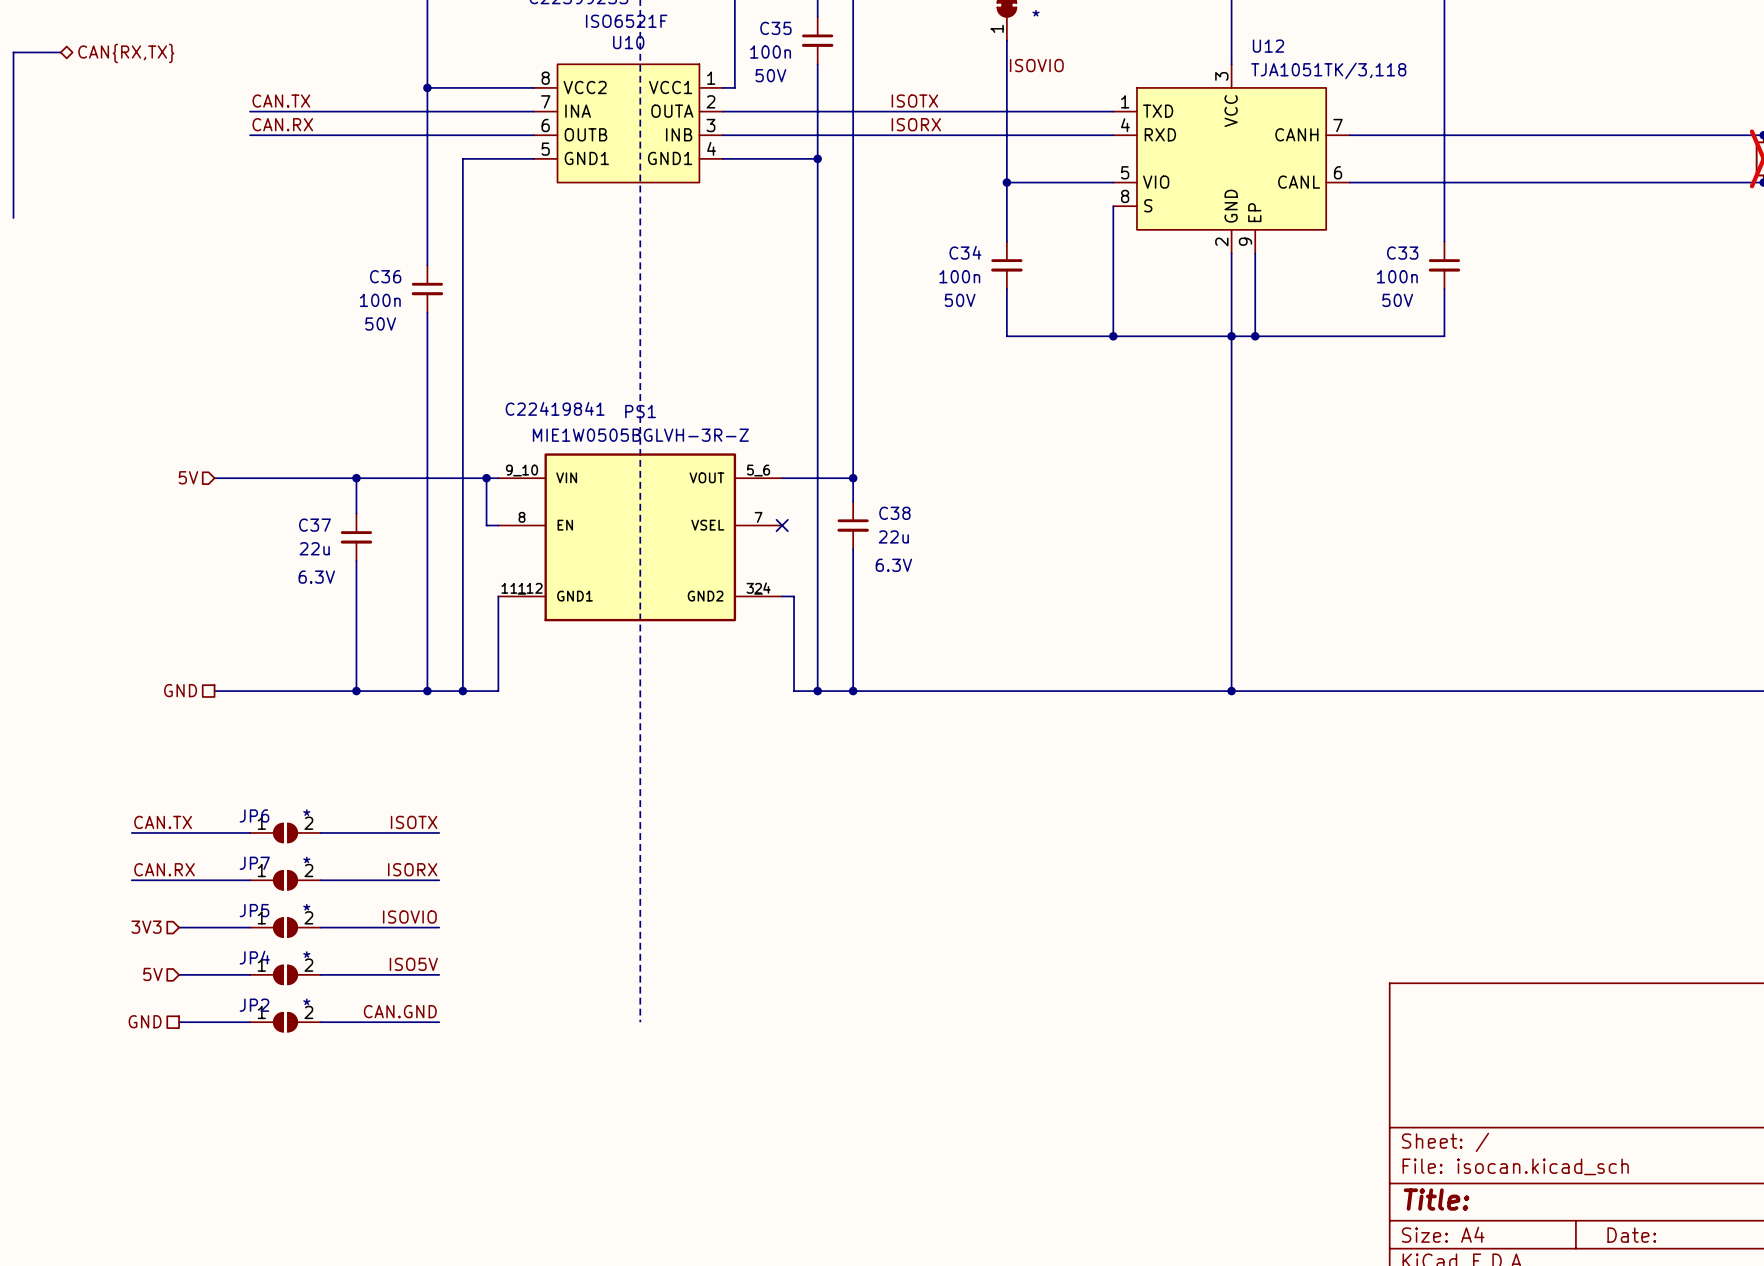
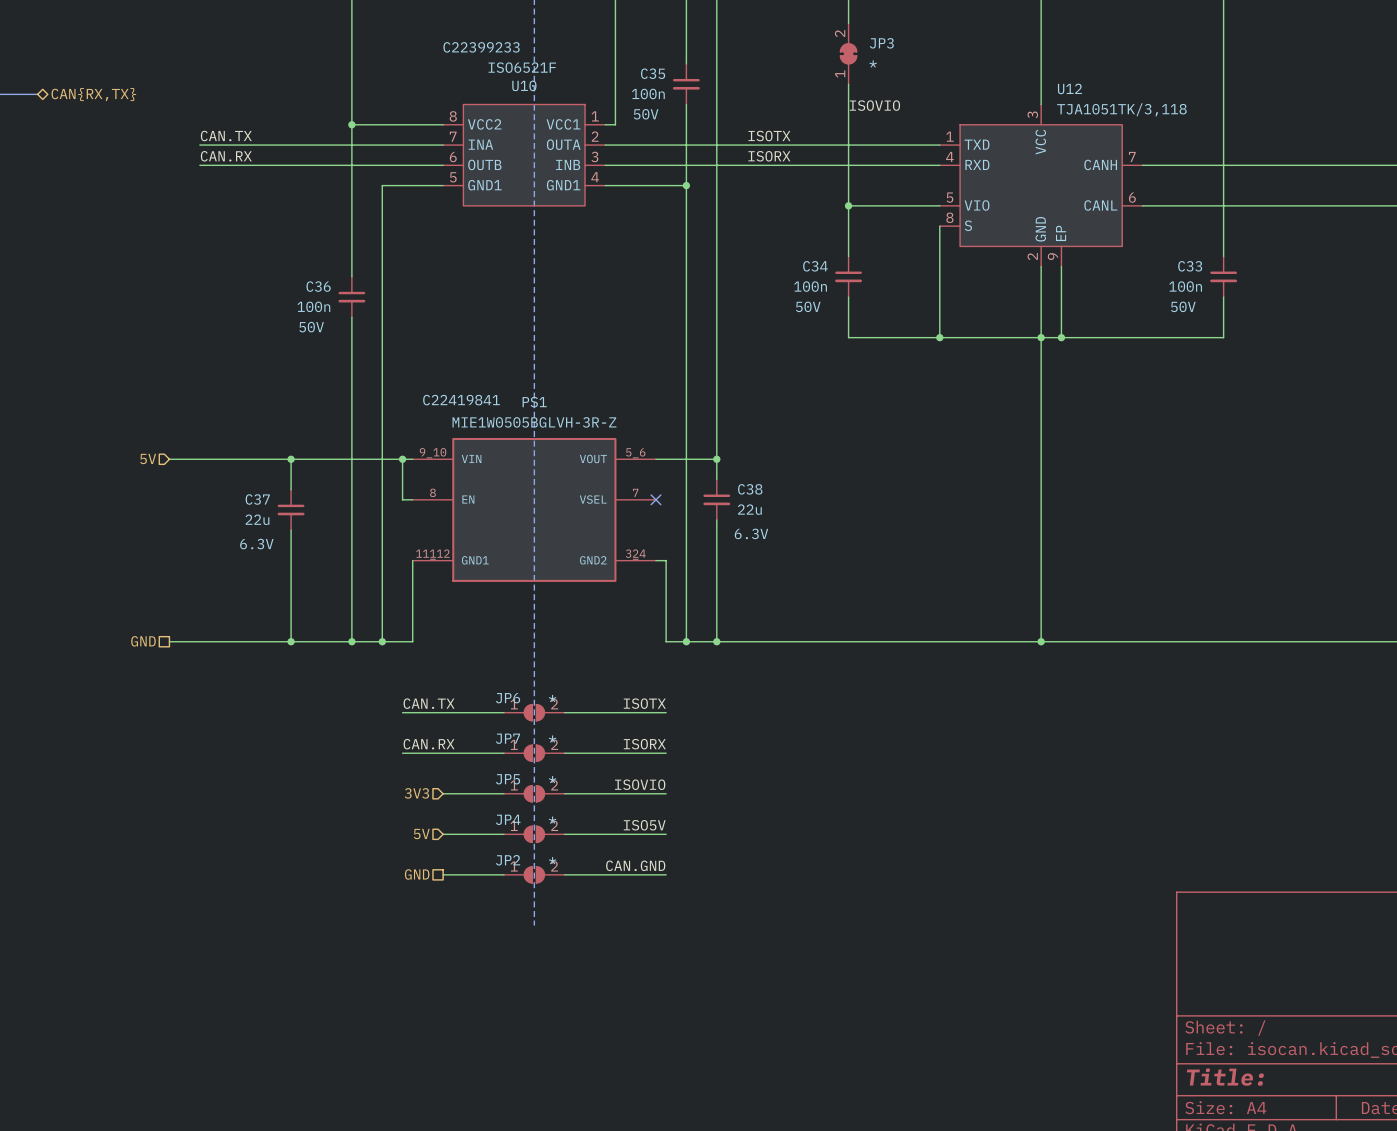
label: none -> CAN.TX (429, 703)
label: none -> ISOTX (644, 703)
wire: none -> (564, 712) (666, 712)
label: none -> CAN.RX (429, 744)
label: none -> ISORX (644, 744)
wire: none -> (564, 753) (666, 753)
label: CAN.TX (163, 822) -> none
label: ISOTX (414, 822) -> none
wire: (131, 832) (250, 832) -> none
JP6 position: (285, 832) -> (534, 712)
wire: (320, 832) (439, 832) -> (402, 712) (503, 712)
label: none -> ISOVIO (640, 784)
hierarchical label: none -> 3V3 (416, 793)
wire: none -> (443, 793) (503, 793)
wire: none -> (564, 793) (666, 793)
label: CAN.RX (164, 869) -> none
label: ISORX (412, 869) -> none
wire: (131, 880) (250, 880) -> none
JP7 position: (285, 880) -> (534, 753)
wire: (320, 880) (439, 880) -> (402, 753) (503, 753)
label: none -> ISO5V (644, 825)
hierarchical label: none -> 5V (421, 834)
wire: none -> (443, 834) (503, 834)
wire: none -> (564, 834) (666, 834)
label: ISOVIO (409, 917) -> none
hierarchical label: 3V3 (146, 927) -> none
wire: (179, 927) (250, 927) -> none
JP5 position: (285, 927) -> (534, 793)
wire: (320, 927) (439, 927) -> none
label: none -> CAN.GND (635, 865)
hierarchical label: none -> GND (417, 874)
wire: none -> (443, 874) (503, 874)
wire: none -> (564, 874) (666, 874)
label: ISO5V (413, 964) -> none
hierarchical label: 5V (152, 974) -> none
wire: (179, 974) (250, 974) -> none
JP4 position: (285, 974) -> (534, 834)
wire: (320, 974) (439, 974) -> none
label: CAN.GND (400, 1011) -> none
hierarchical label: GND (145, 1021) -> none
wire: (179, 1022) (250, 1022) -> none
JP2 position: (285, 1022) -> (534, 874)
wire: (320, 1022) (439, 1022) -> none

